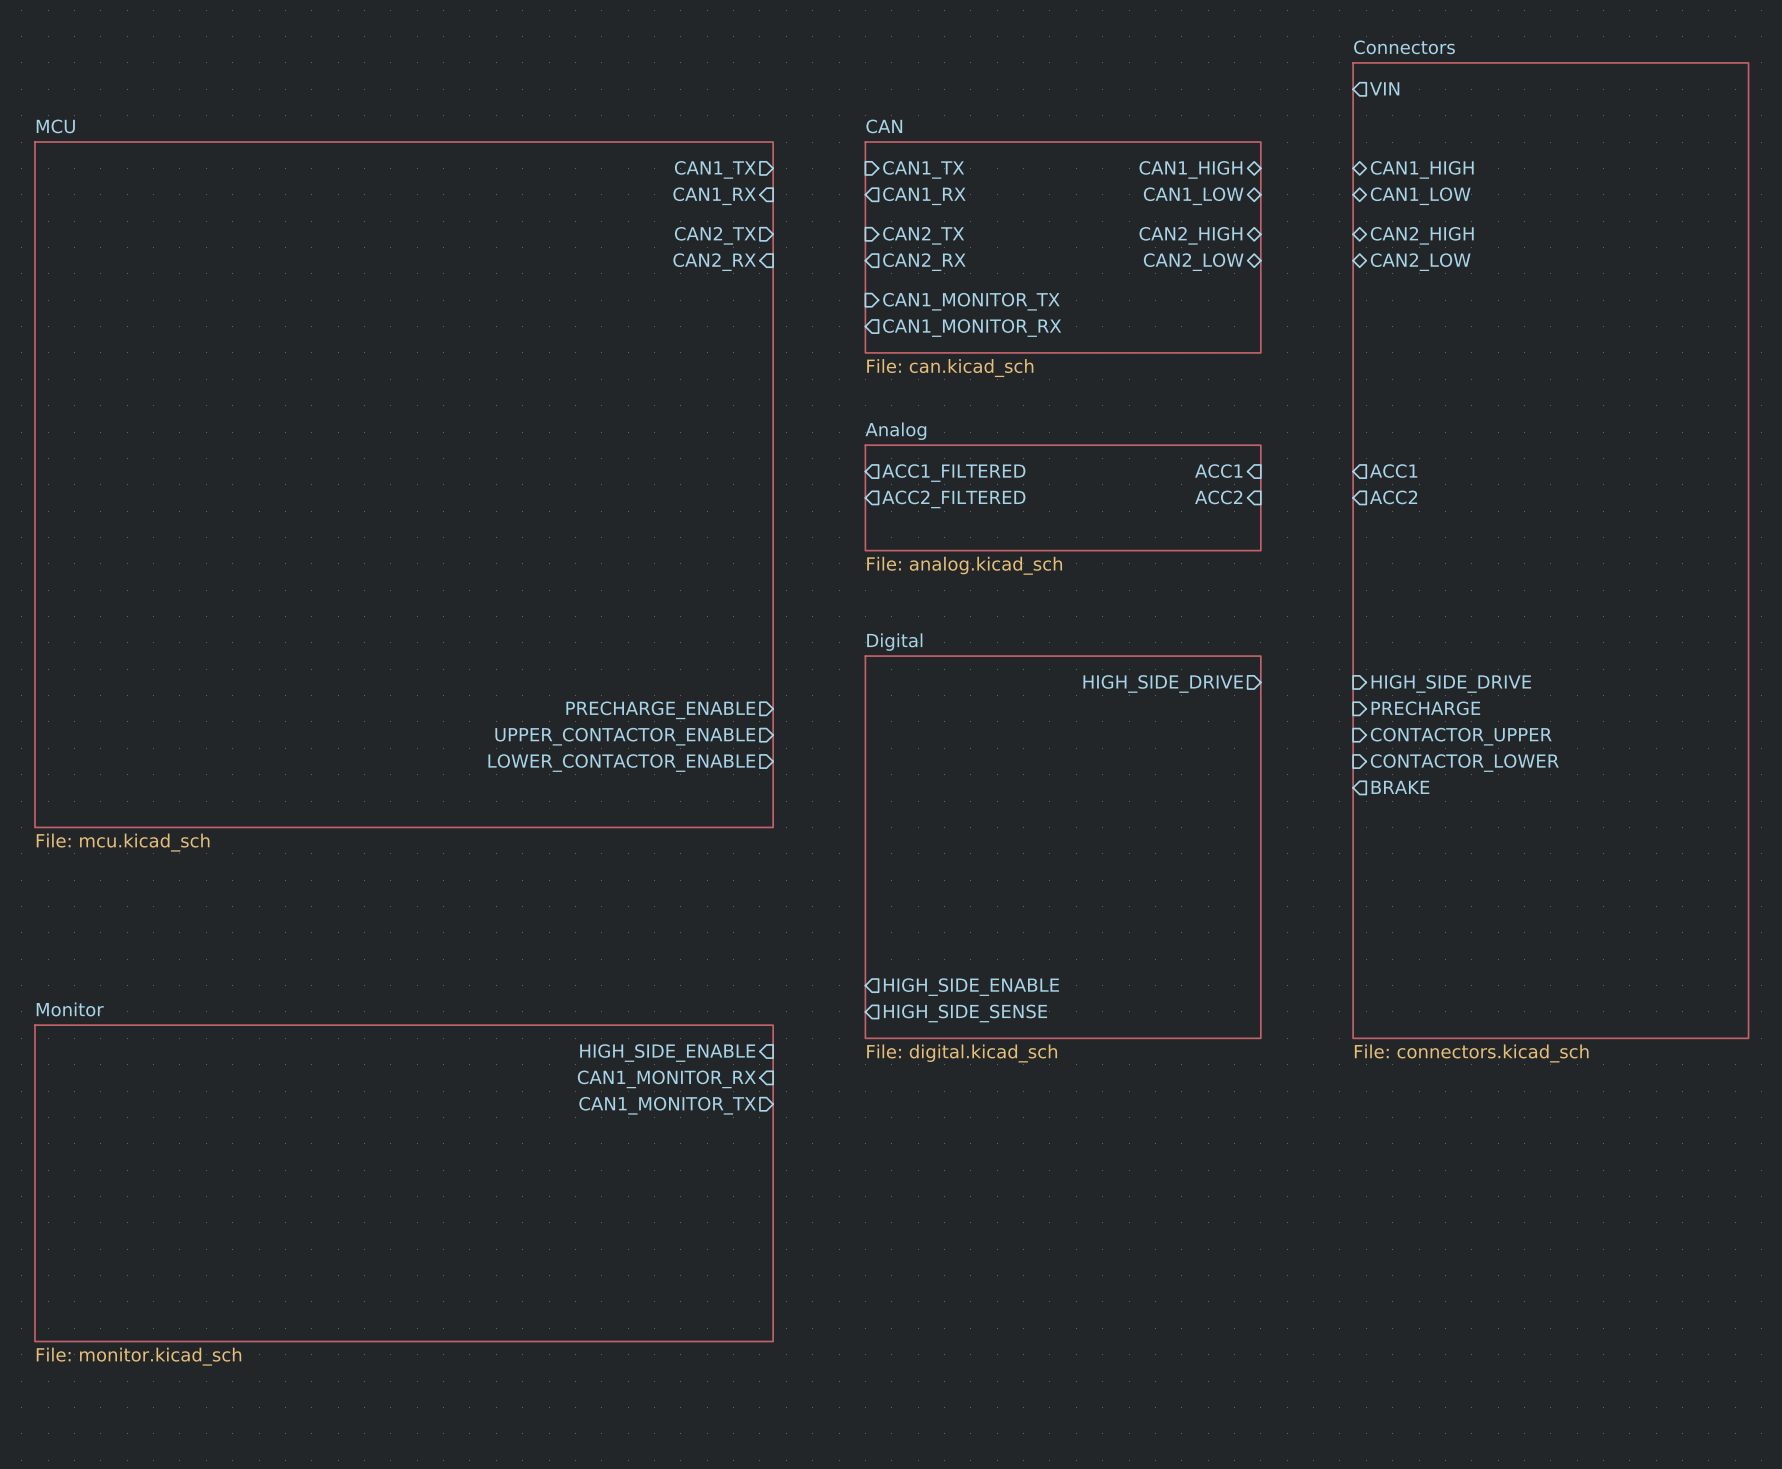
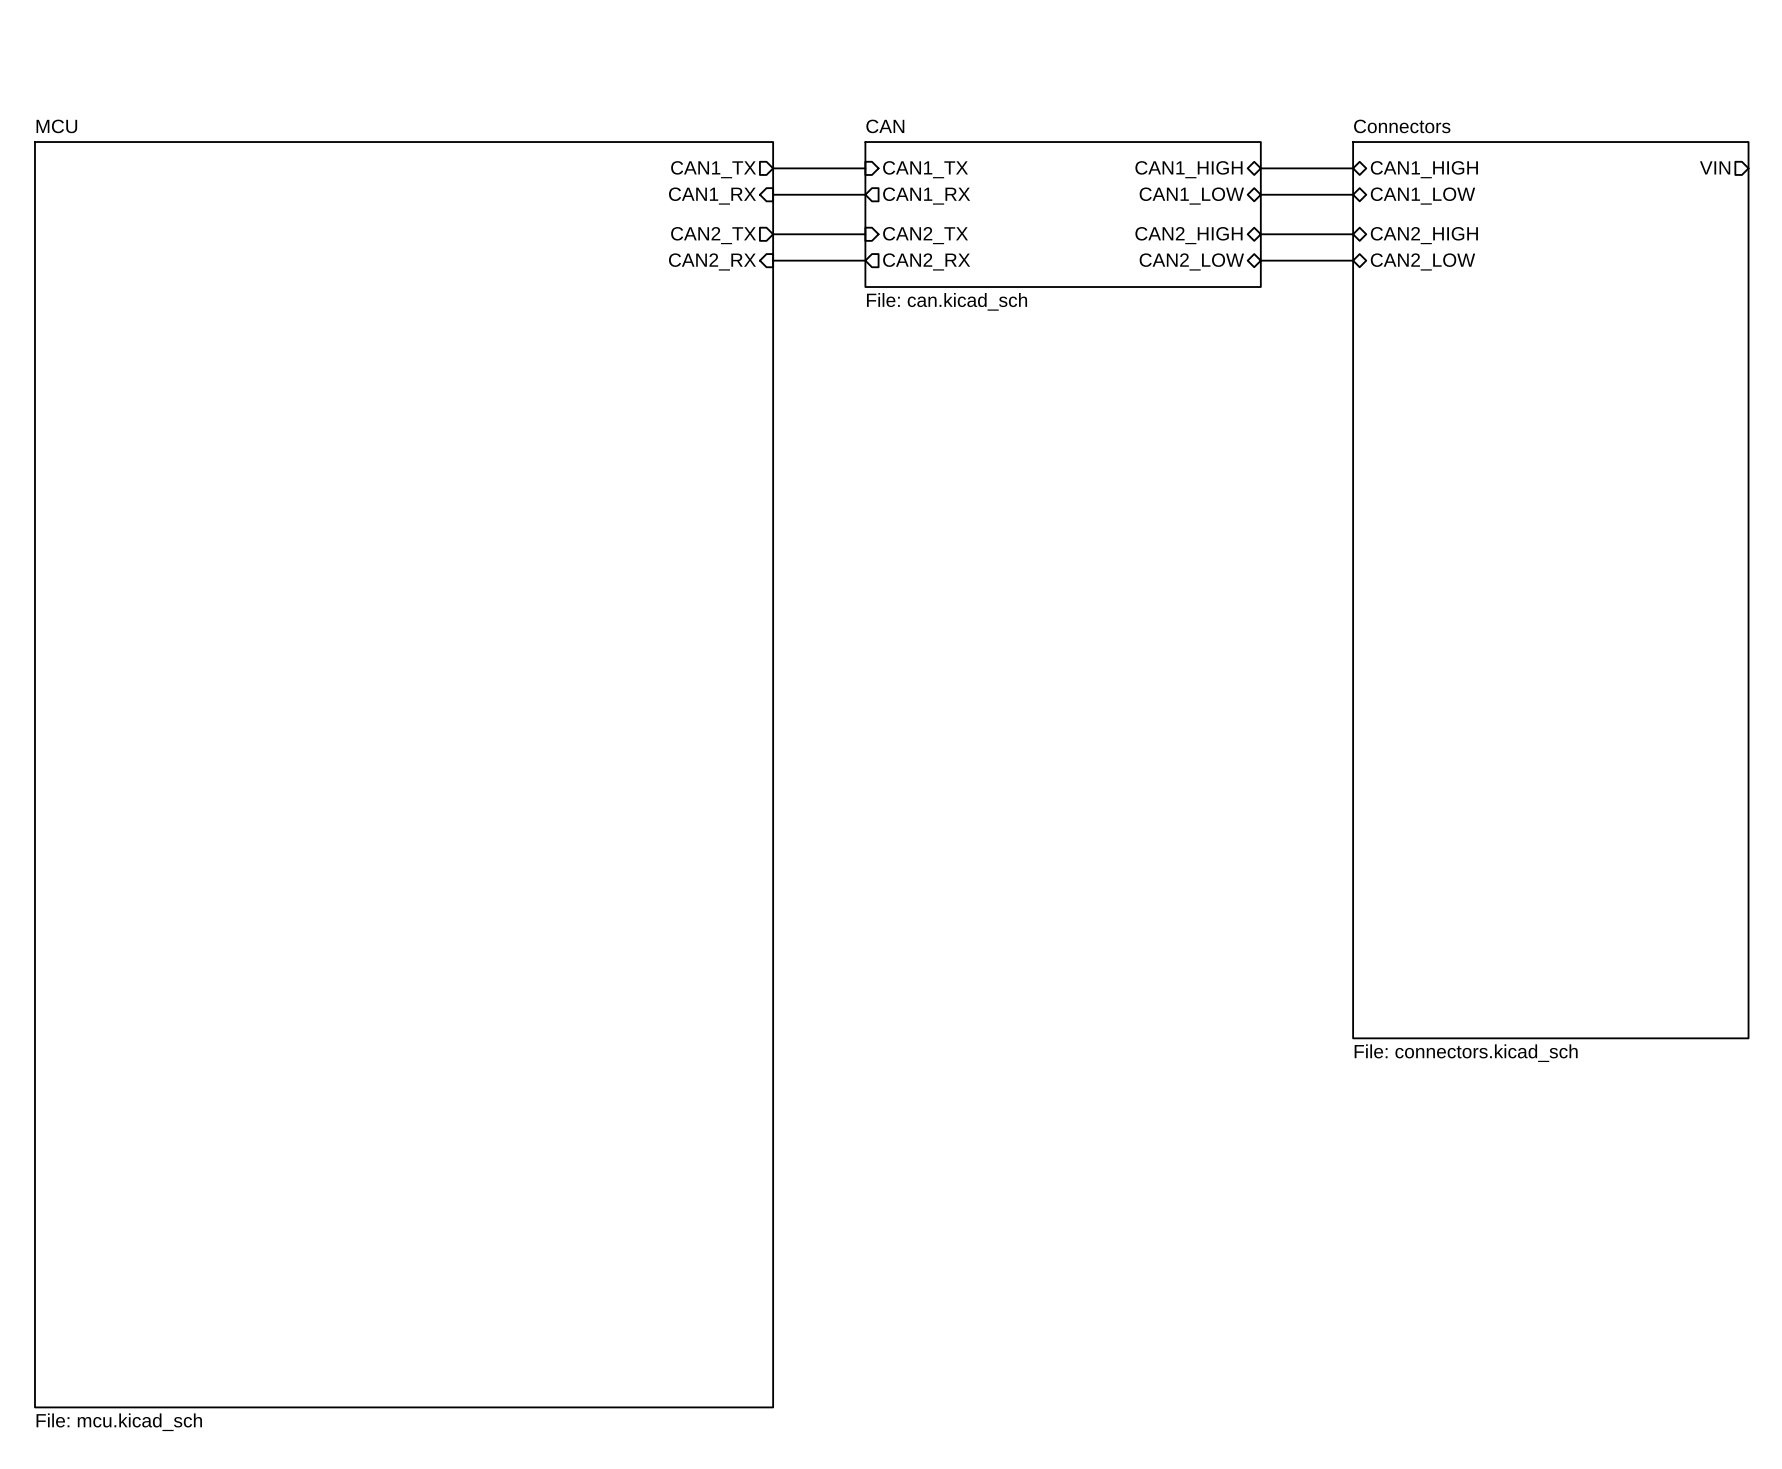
sheet pin: VIN (1384, 88) -> none
sheet pin: none -> VIN (1715, 167)
wire: none -> (773, 168) (865, 168)
wire: none -> (1260, 168) (1353, 168)
wire: none -> (773, 194) (865, 194)
wire: none -> (1260, 194) (1353, 194)
sheet CAN: none -> File: can.kicad_sch (1063, 214)
wire: none -> (773, 234) (865, 234)
wire: none -> (1260, 234) (1353, 234)
sheet CAN: File: can.kicad_sch (1063, 247) -> none
wire: none -> (773, 260) (865, 260)
wire: none -> (1260, 260) (1353, 260)
sheet pin: CAN1_MONITOR_TX (971, 301) -> none
sheet pin: CAN1_MONITOR_RX (972, 328) -> none
sheet pin: ACC1 (1218, 471) -> none
sheet pin: ACC1 (1393, 471) -> none
sheet pin: ACC1_FILTERED (953, 473) -> none
sheet MCU: File: mcu.kicad_sch (404, 484) -> none
sheet Analog: File: analog.kicad_sch (1063, 497) -> none
sheet pin: ACC2 (1218, 497) -> none
sheet pin: ACC2 (1393, 497) -> none
sheet pin: ACC2_FILTERED (953, 499) -> none
sheet Connectors: File: connectors.kicad_sch (1550, 550) -> none
sheet Connectors: none -> File: connectors.kicad_sch (1550, 590)
sheet pin: HIGH_SIDE_DRIVE (1163, 683) -> none
sheet pin: HIGH_SIDE_DRIVE (1451, 683) -> none
sheet pin: PRECHARGE (1425, 708) -> none
sheet pin: PRECHARGE_ENABLE (660, 710) -> none
sheet pin: UPPER_CONTACTOR_ENABLE (625, 736) -> none
sheet pin: CONTACTOR_UPPER (1461, 736) -> none
sheet pin: LOWER_CONTACTOR_ENABLE (621, 763) -> none
sheet pin: CONTACTOR_LOWER (1464, 763) -> none
sheet MCU: none -> File: mcu.kicad_sch (404, 774)
sheet pin: BRAKE (1400, 787) -> none
sheet Digital: File: digital.kicad_sch (1063, 847) -> none
sheet pin: HIGH_SIDE_ENABLE (971, 987) -> none
sheet pin: HIGH_SIDE_SENSE (965, 1013) -> none
sheet pin: HIGH_SIDE_ENABLE (667, 1053) -> none
sheet pin: CAN1_MONITOR_RX (666, 1079) -> none
sheet pin: CAN1_MONITOR_TX (667, 1105) -> none
sheet Monitor: File: monitor.kicad_sch (404, 1183) -> none

